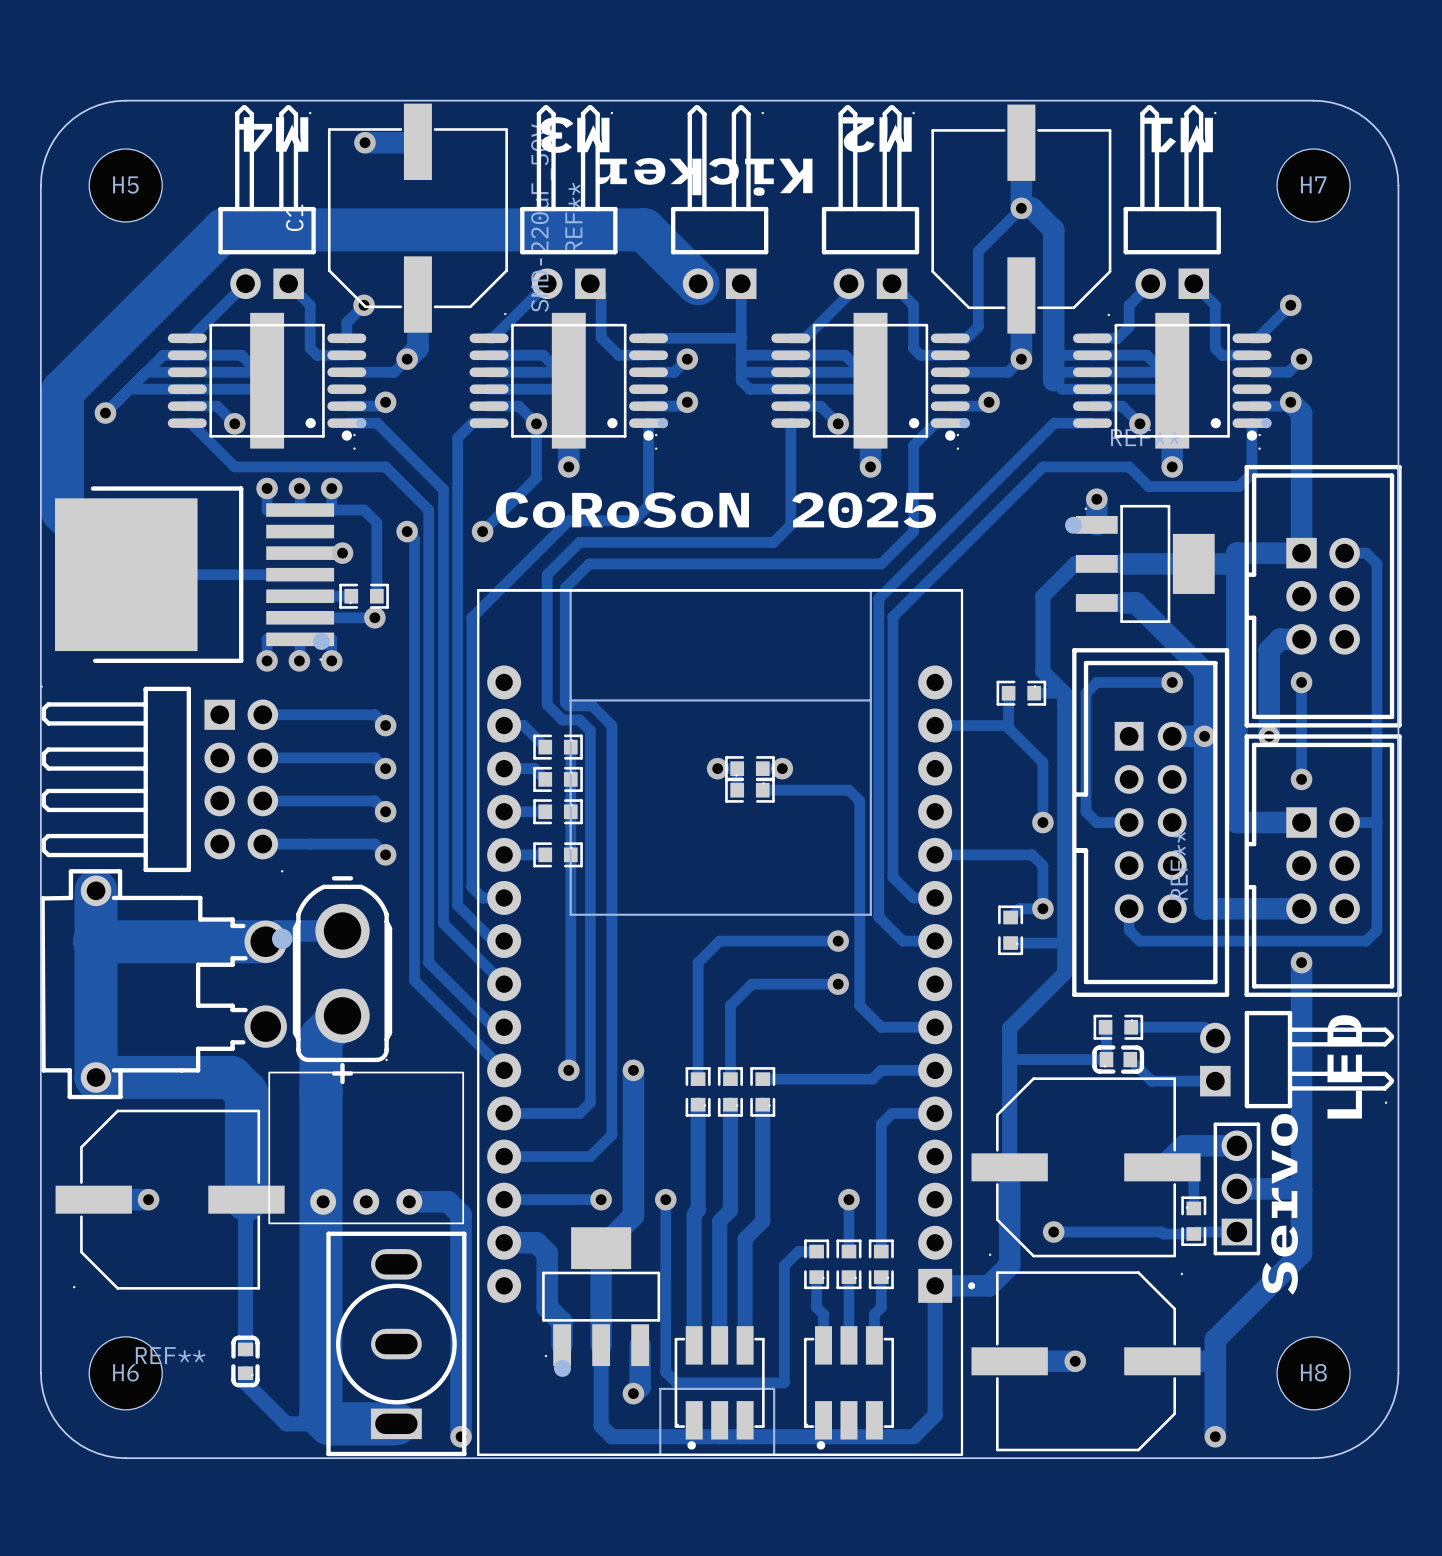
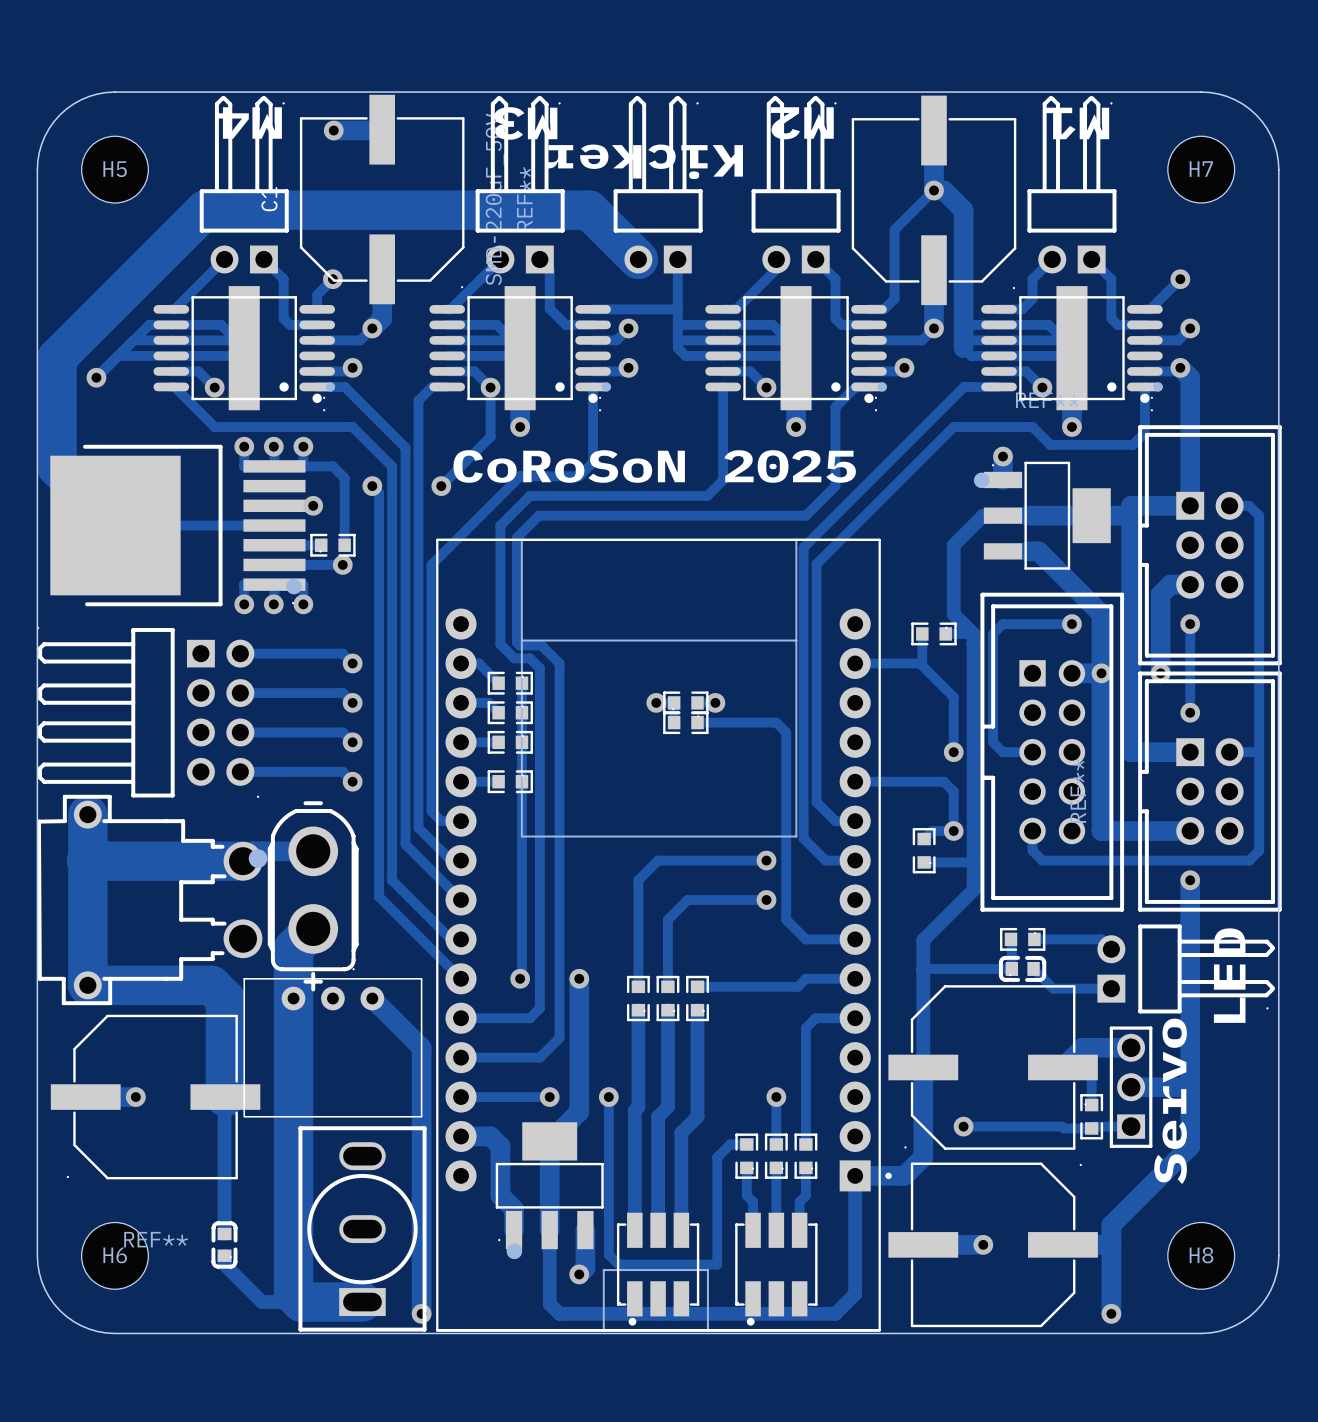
part rotation: 0° (366, 1147) -> 180° (332, 1047)
track: (409, 1201) (448, 1201) (461, 1214) -> (372, 998) (421, 1047) (421, 1110)

